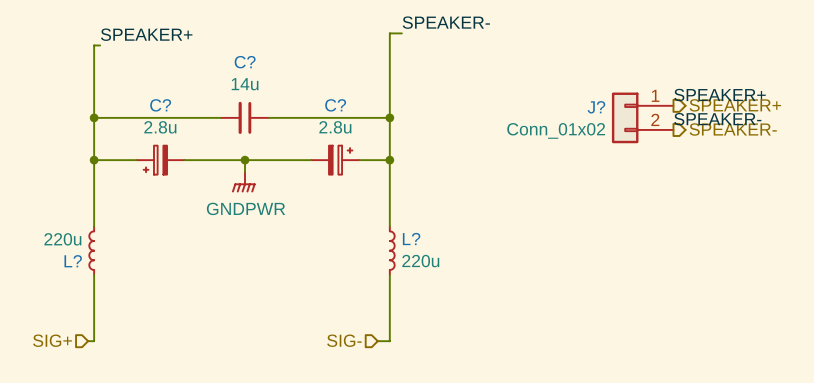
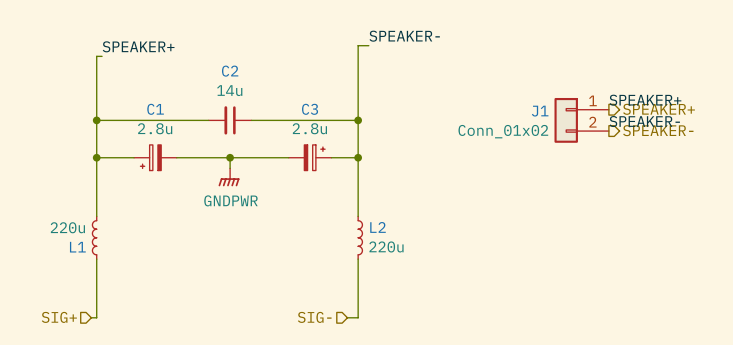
C? name: C? (245, 62) -> C2 (230, 71)
C? name: C? (160, 105) -> C1 (155, 109)
C? name: C? (335, 105) -> C3 (310, 109)
J? name: J? (596, 107) -> J1 (540, 111)
L? name: L? (411, 239) -> L2 (378, 227)
L? name: L? (73, 261) -> L1 (77, 247)

